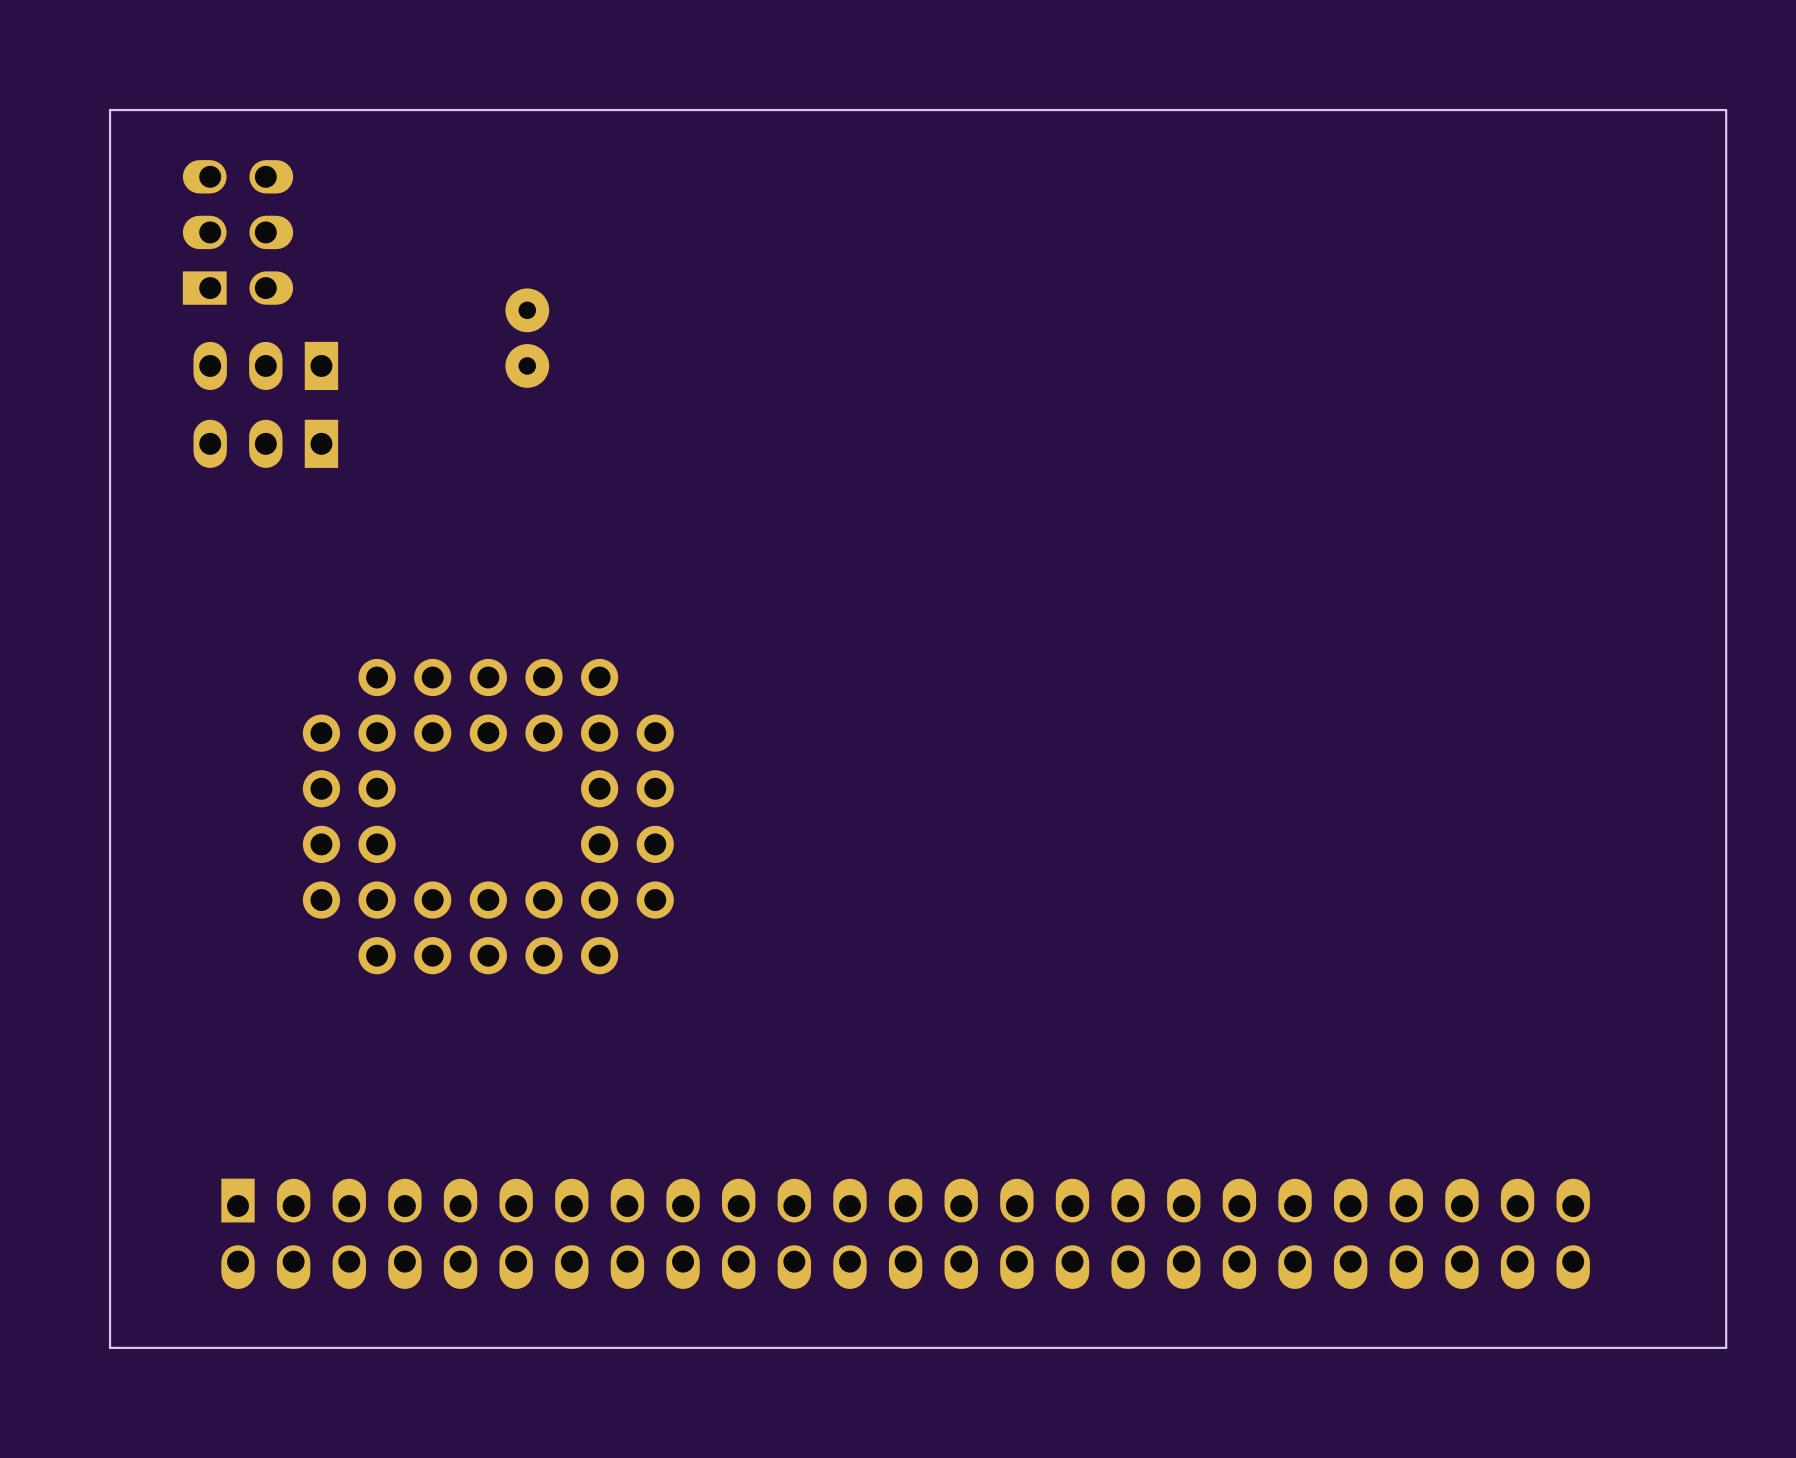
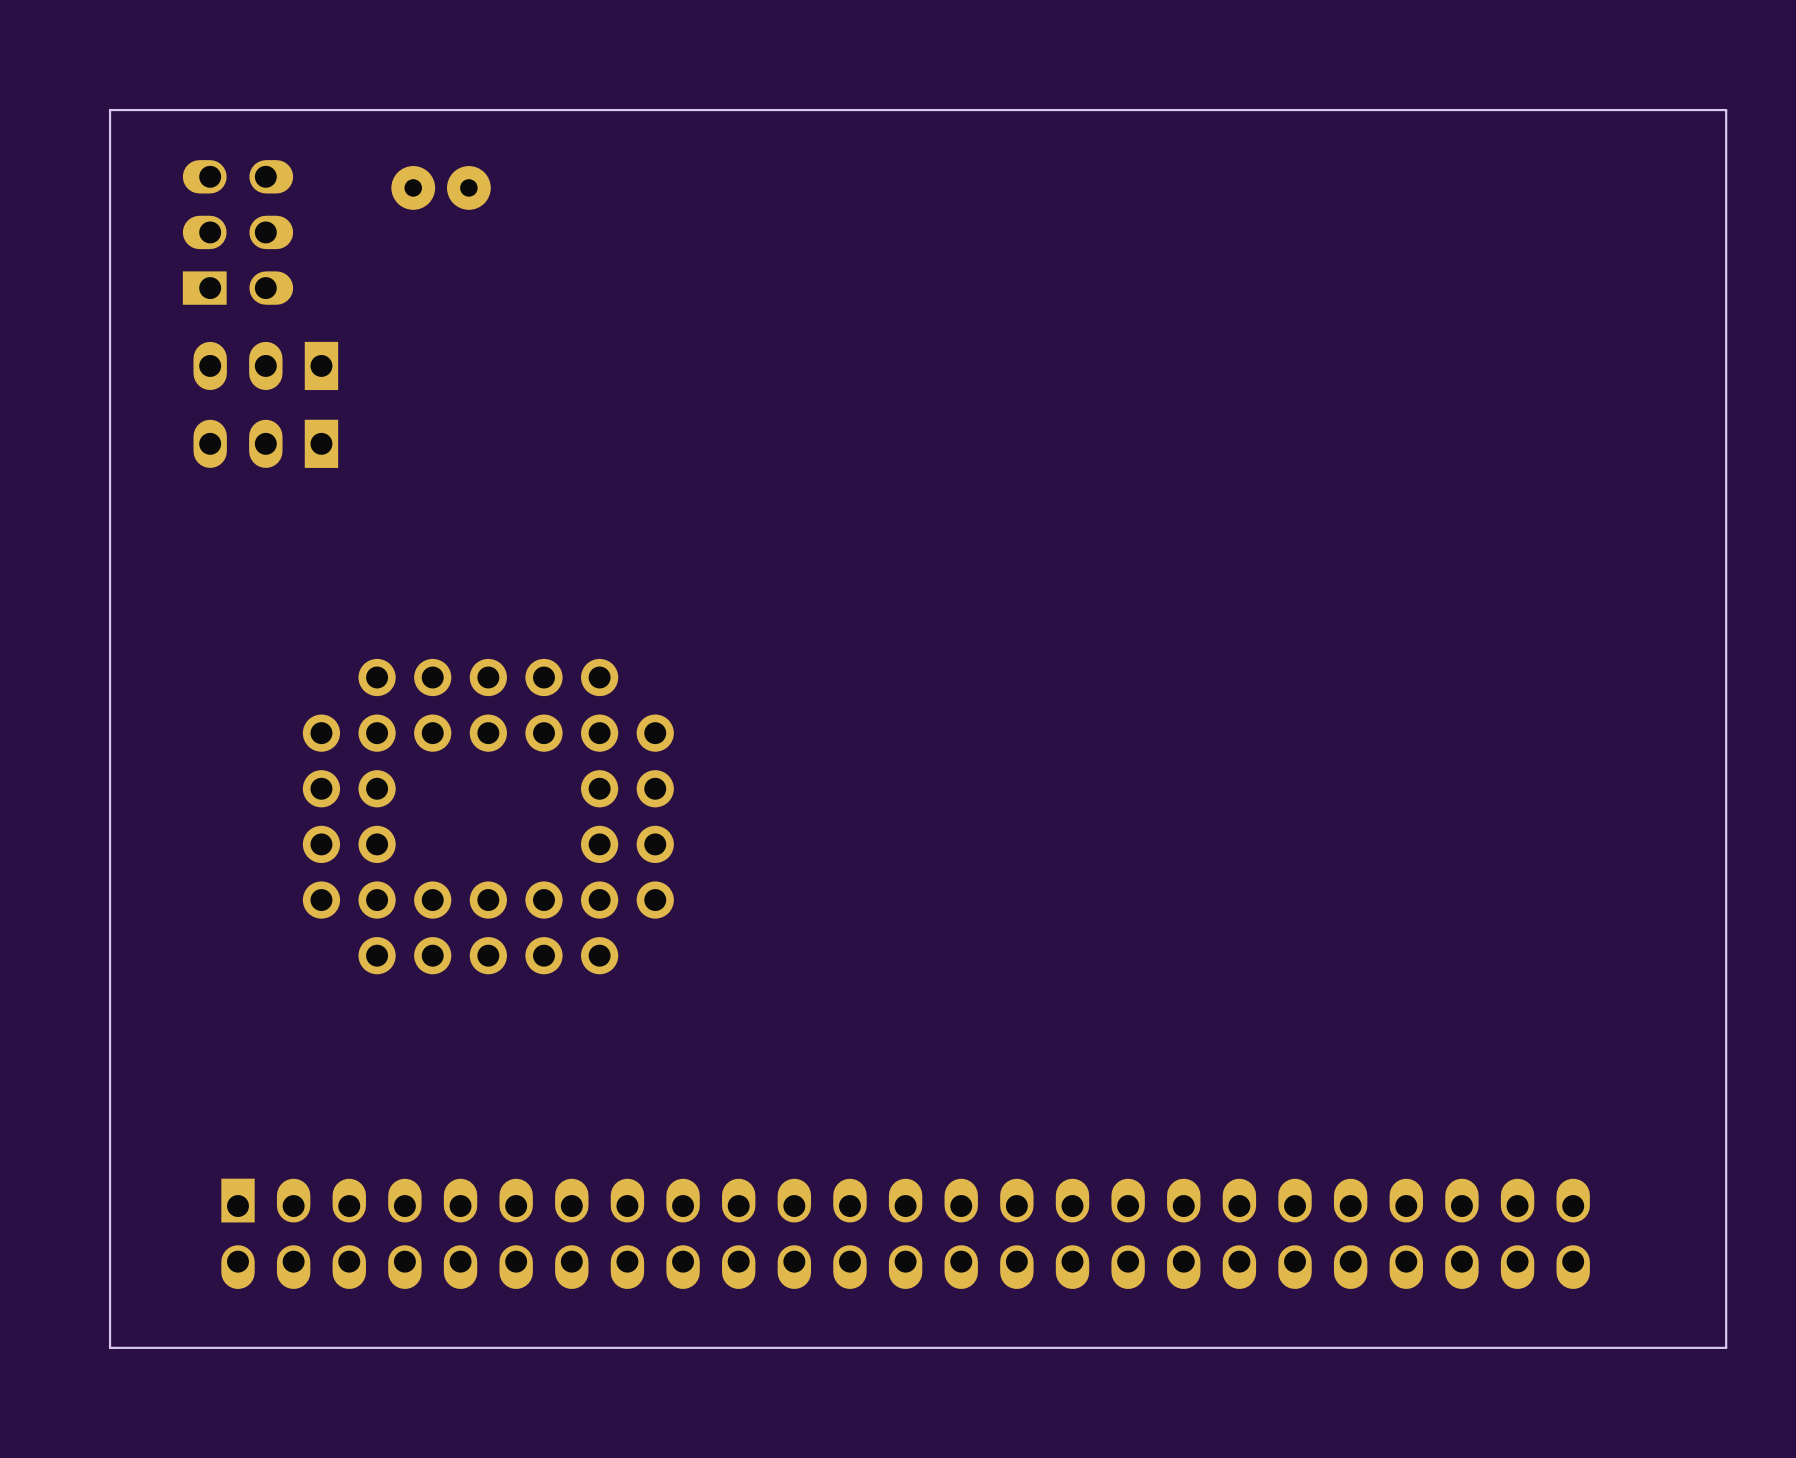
part rotation: 0° (527, 338) -> 90° clockwise (441, 187)
part position: (527, 338) -> (441, 187)

